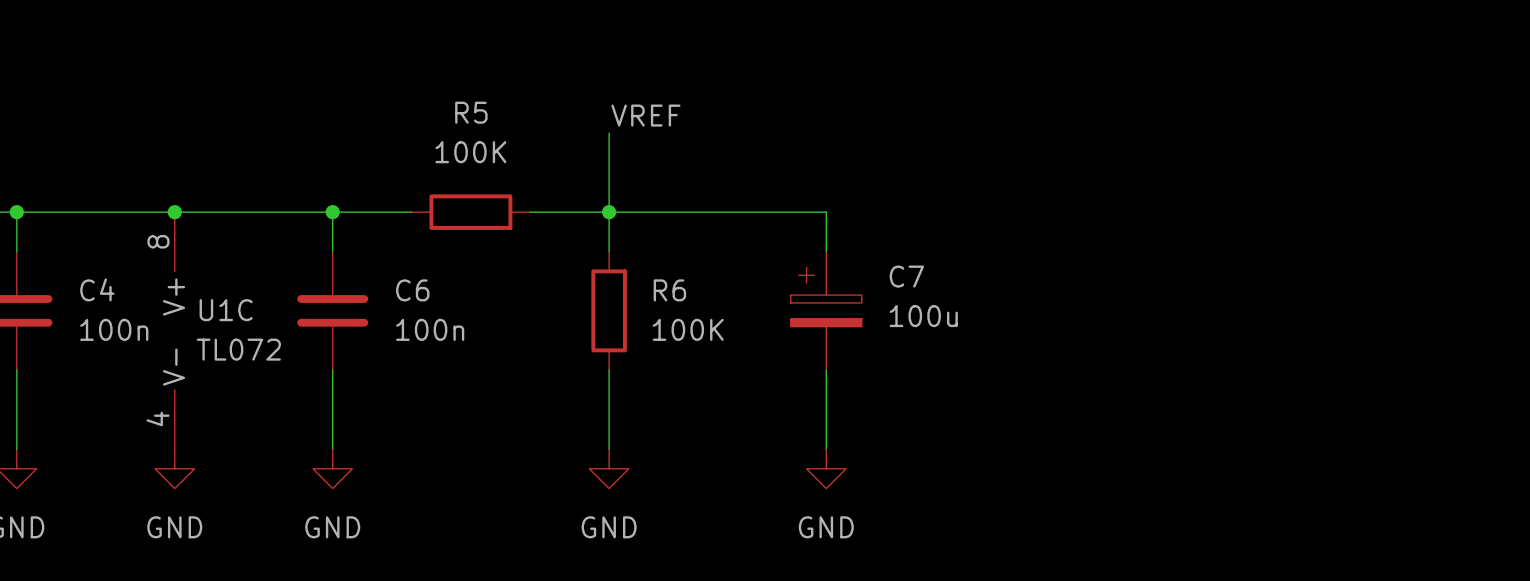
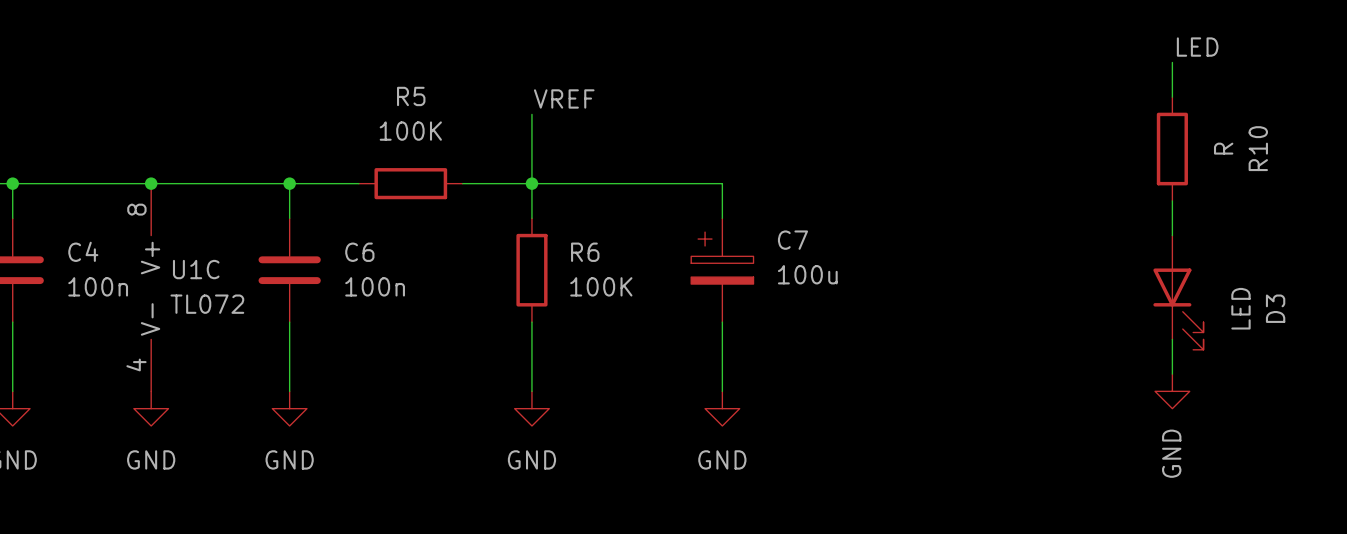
label: none -> LED (1197, 47)
wire: none -> (1172, 62) (1172, 97)
R10: none -> R (1172, 149)
wire: none -> (1172, 200) (1172, 235)
D3: none -> LED (1178, 292)
wire: none -> (1172, 339) (1172, 374)
power symbol: none -> GND (1172, 391)

